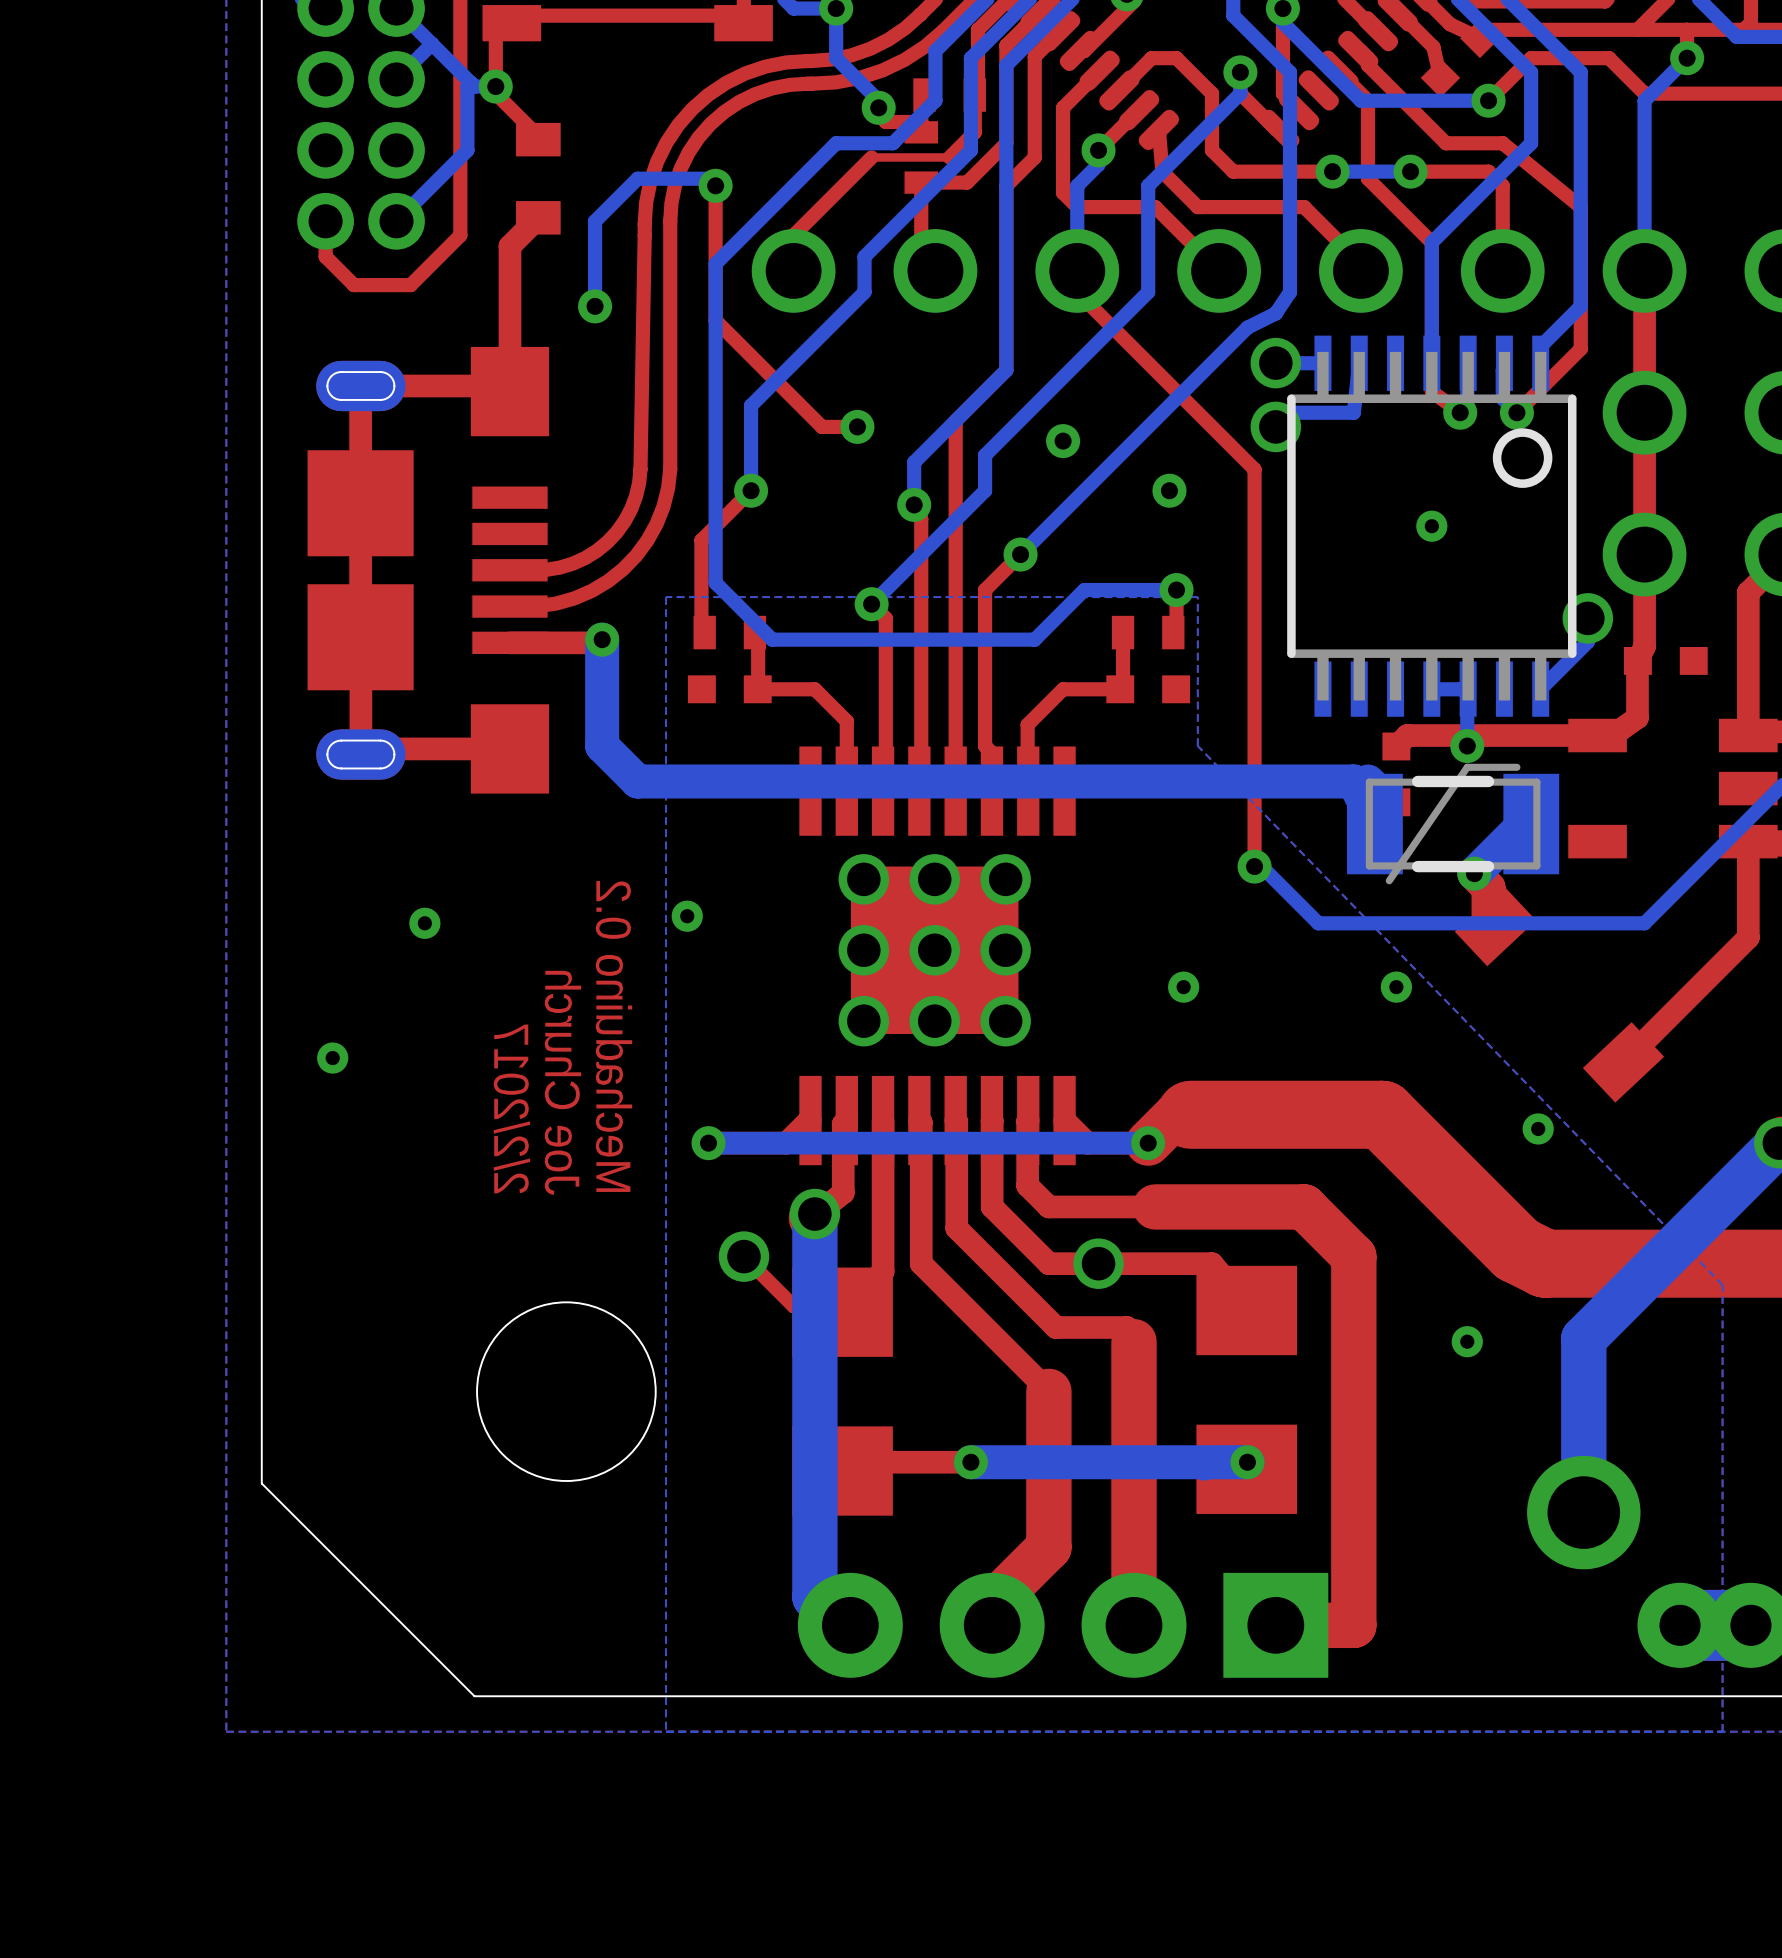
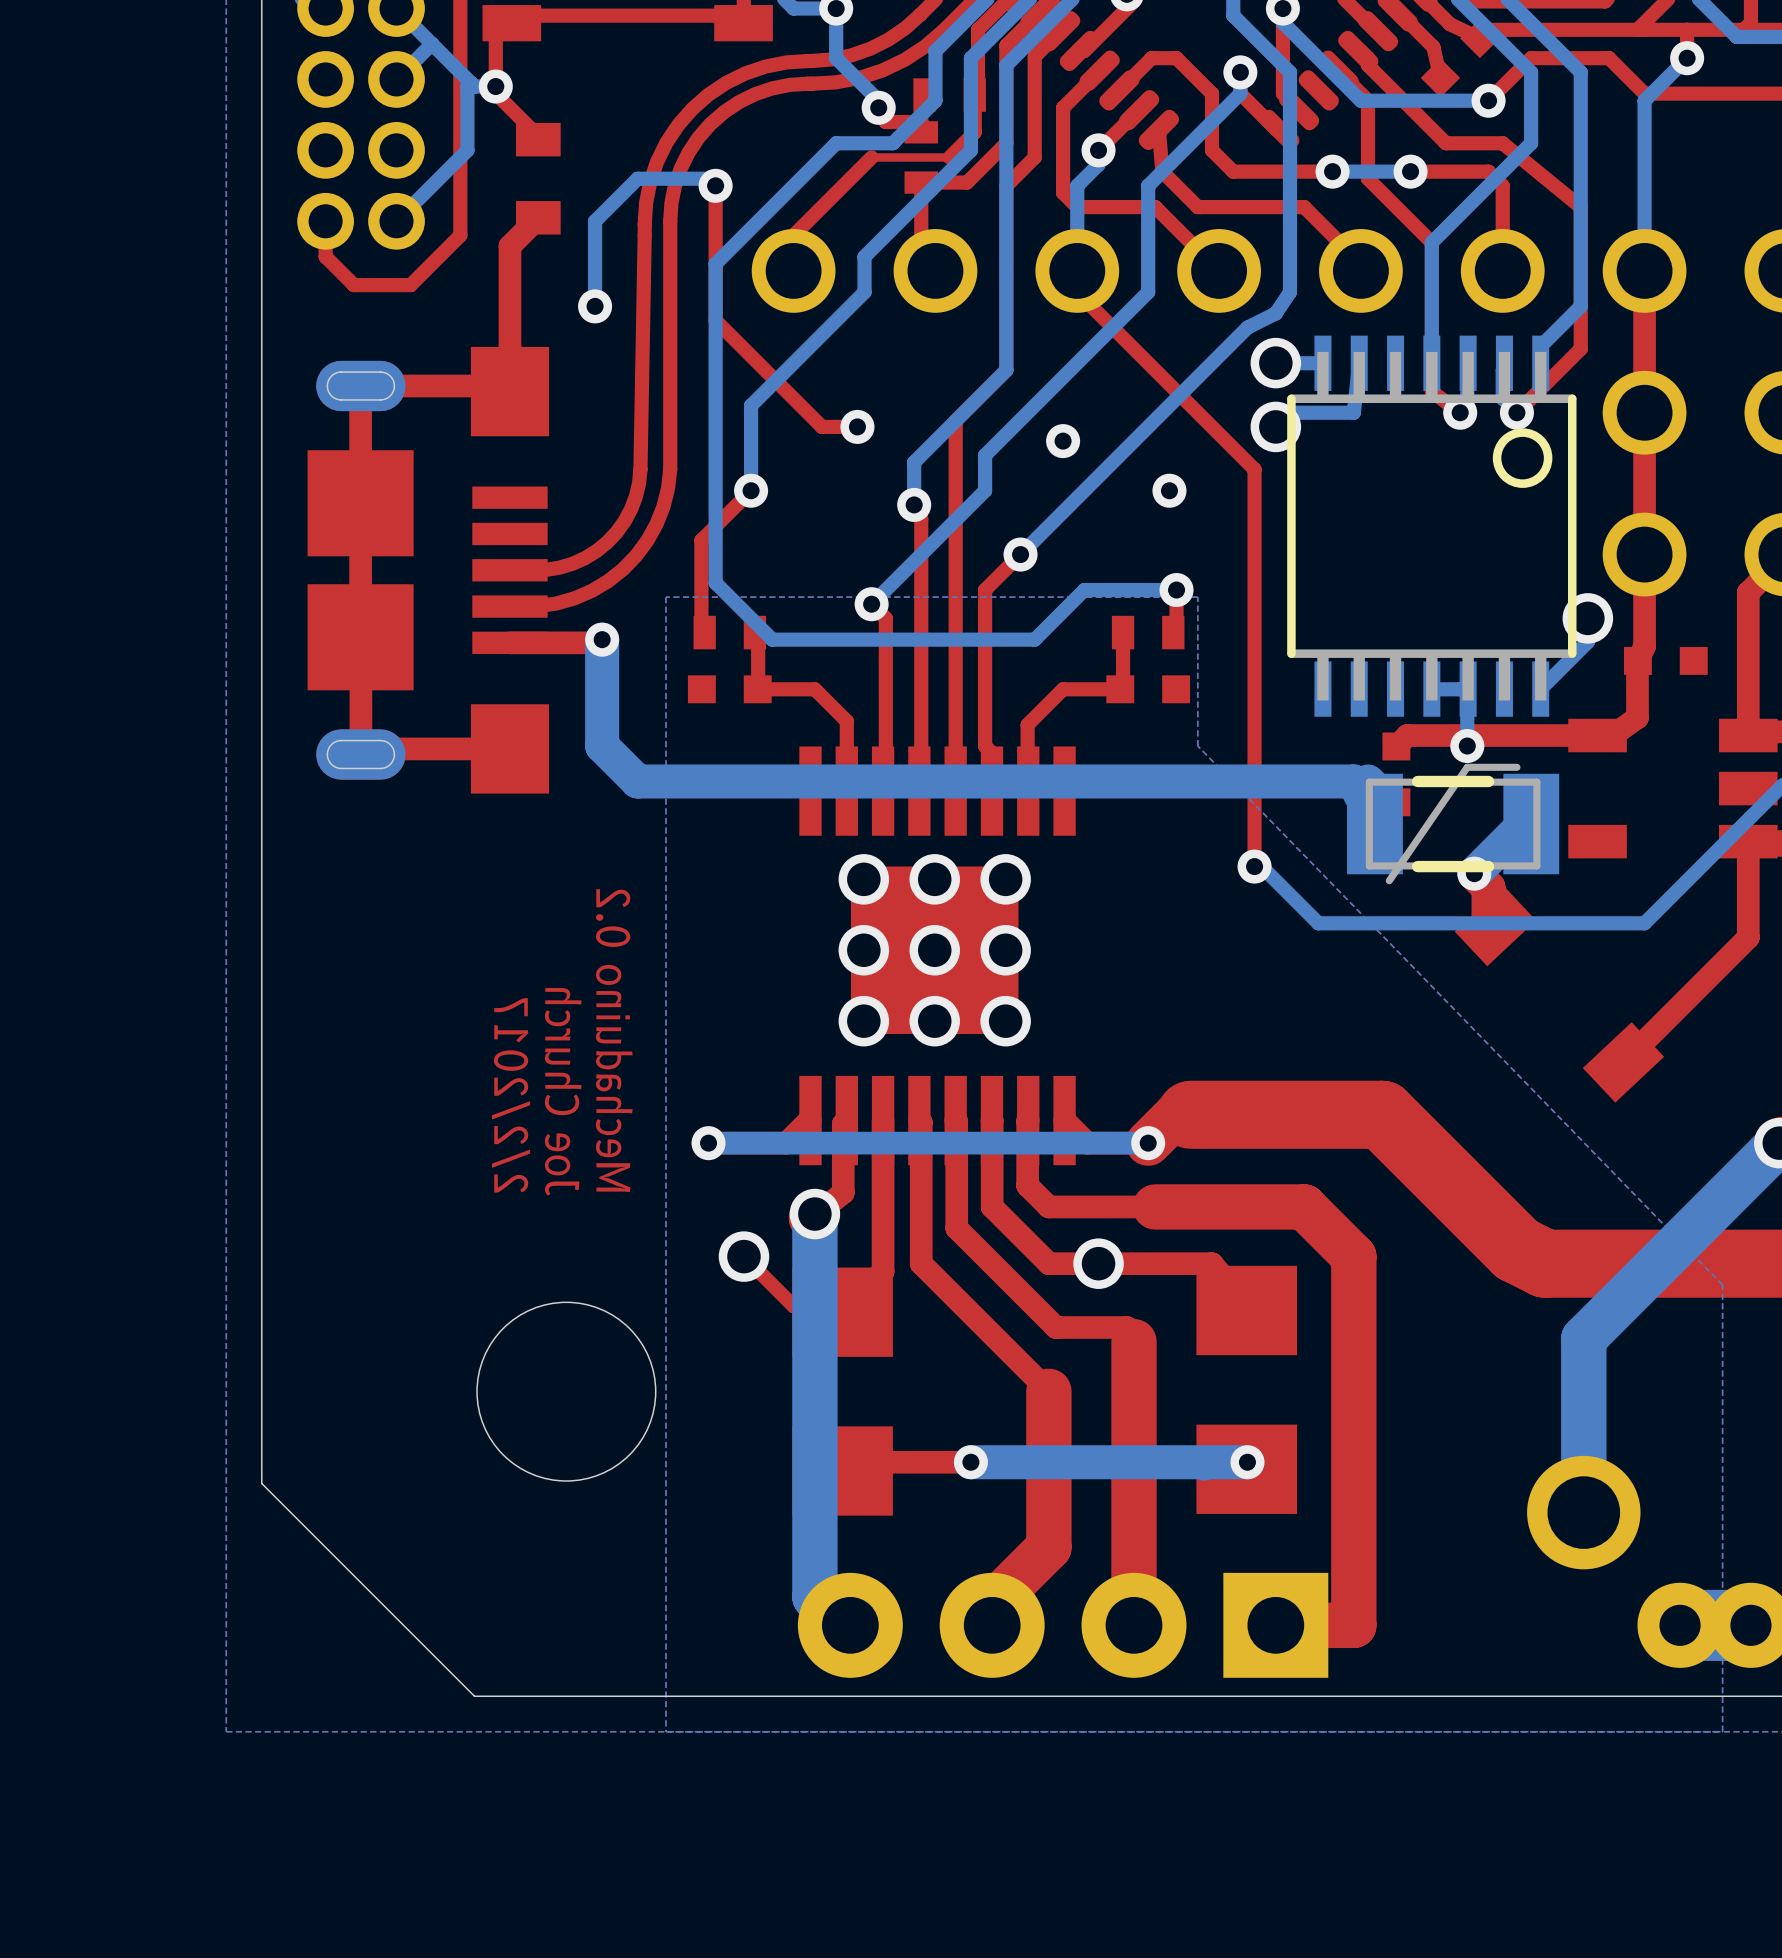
via: (1431, 526) -> none
via: (687, 916) -> none
via: (424, 923) -> none
via: (1183, 987) -> none
via: (1396, 987) -> none
via: (332, 1058) -> none
via: (1538, 1128) -> none
via: (1467, 1341) -> none

